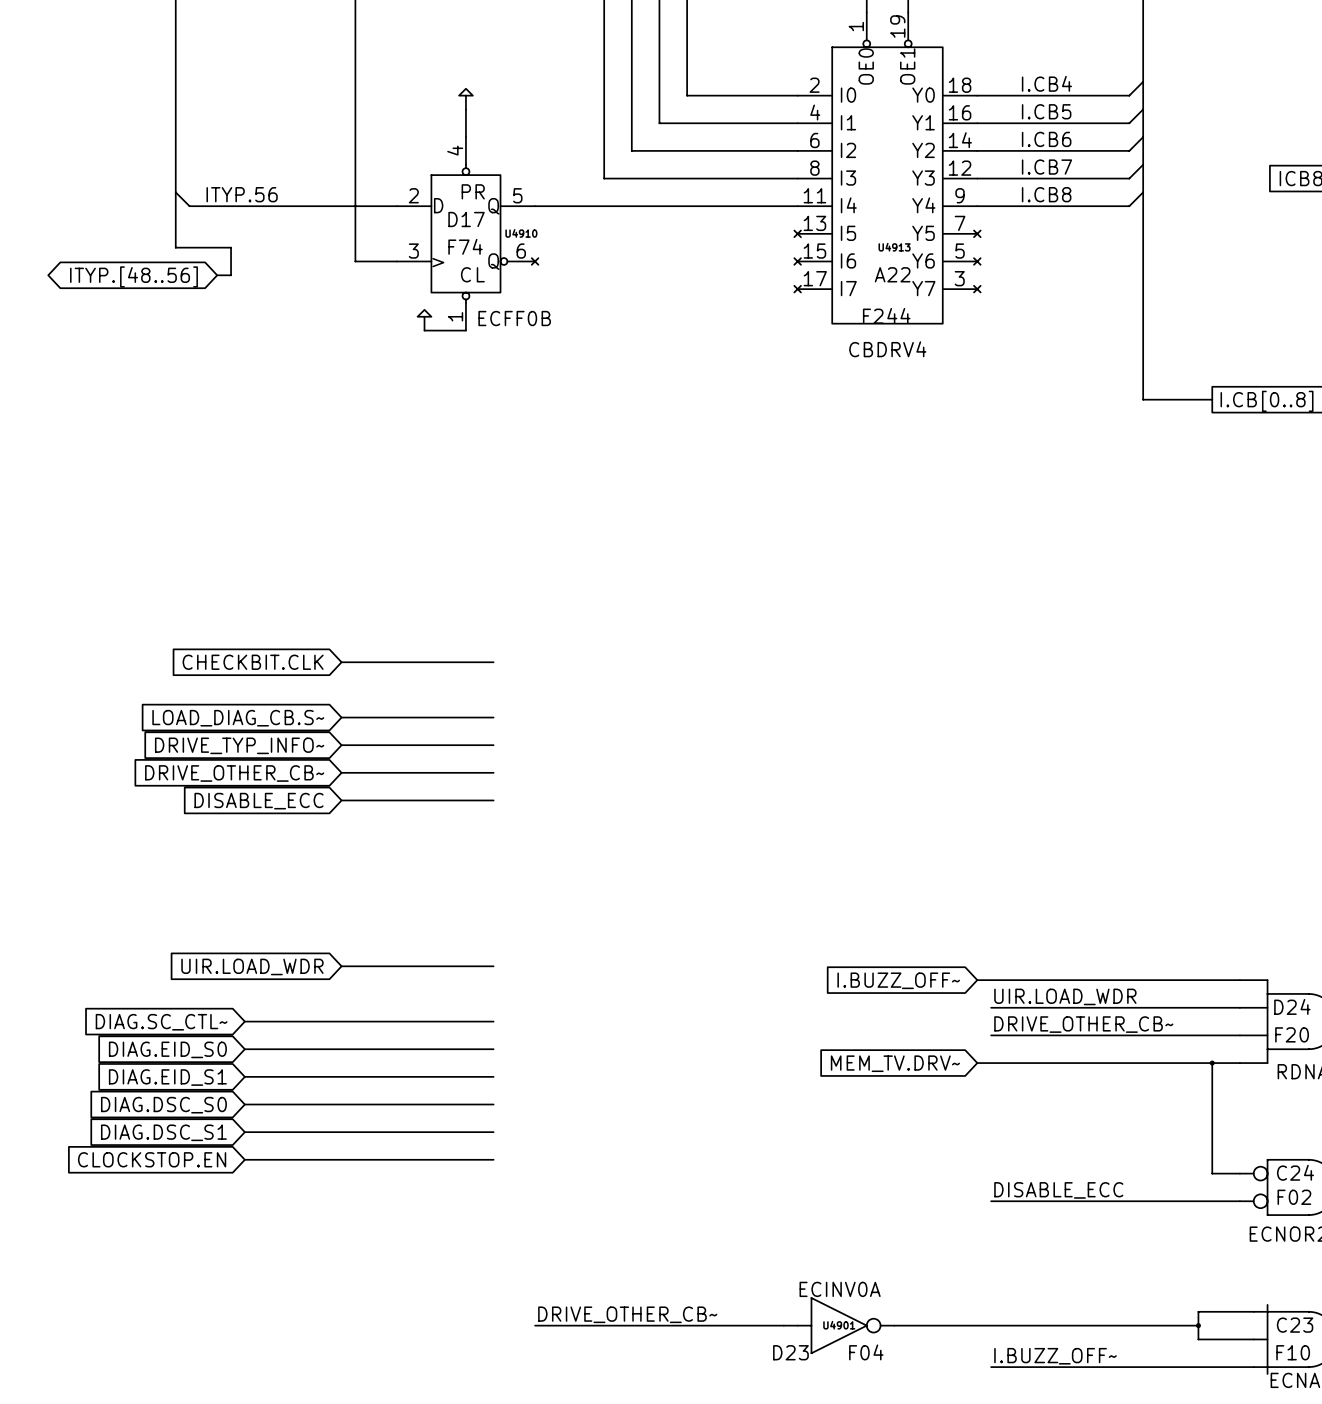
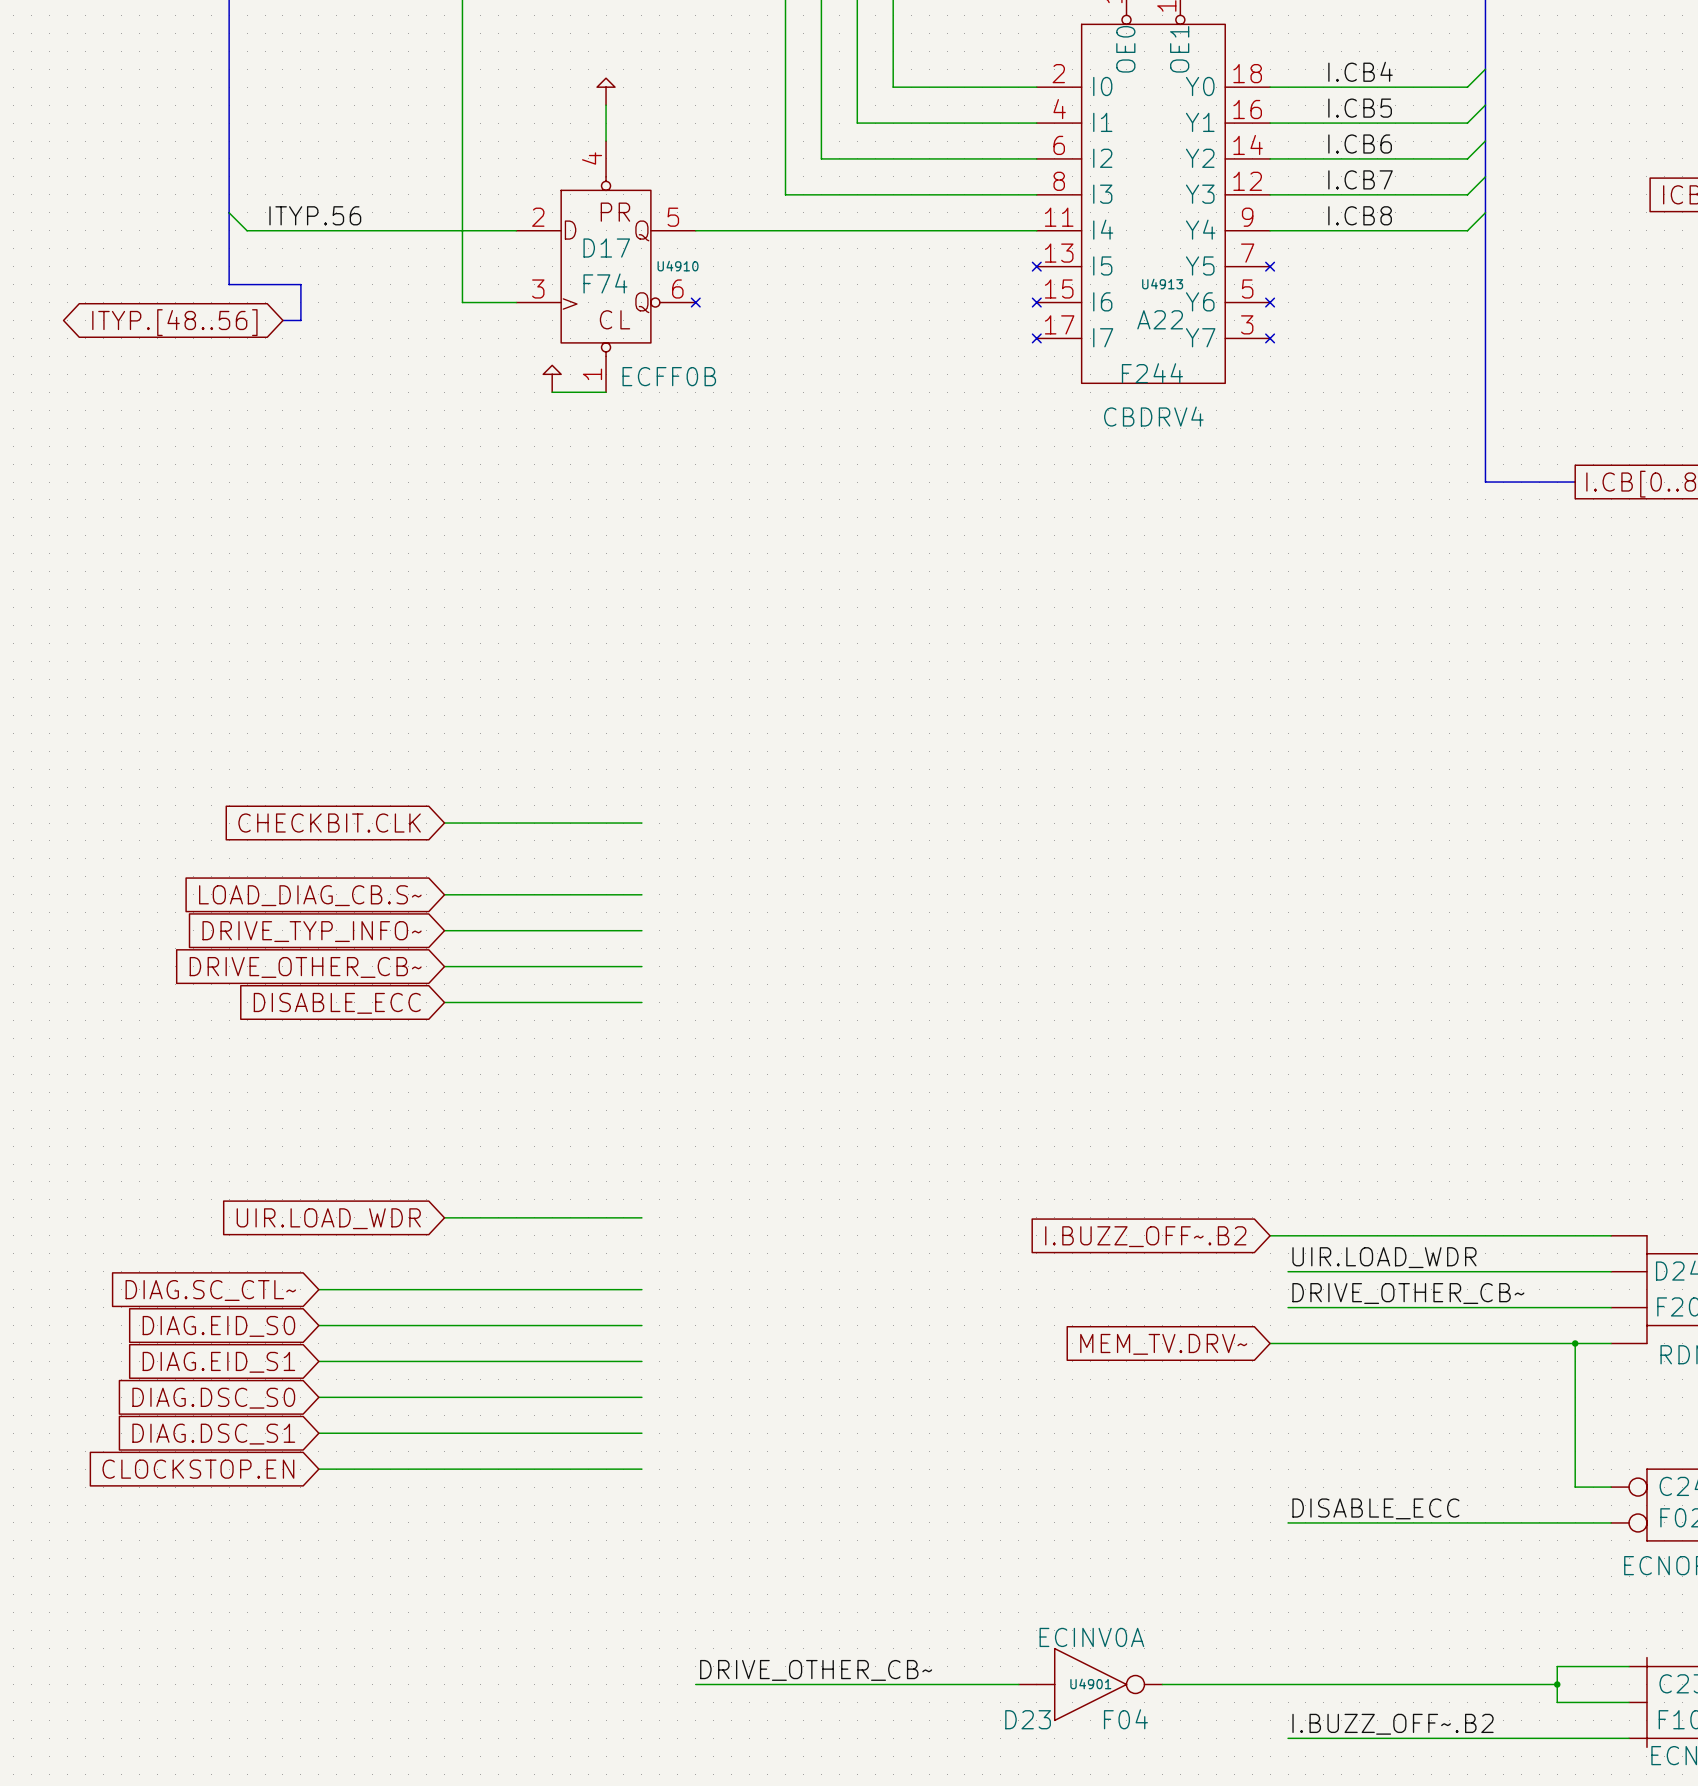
global label: I.BUZZ_OFF~ (898, 980) -> I.BUZZ_OFF~.B2 (1145, 1236)
label: I.BUZZ_OFF~ (1055, 1356) -> I.BUZZ_OFF~.B2 (1393, 1724)

